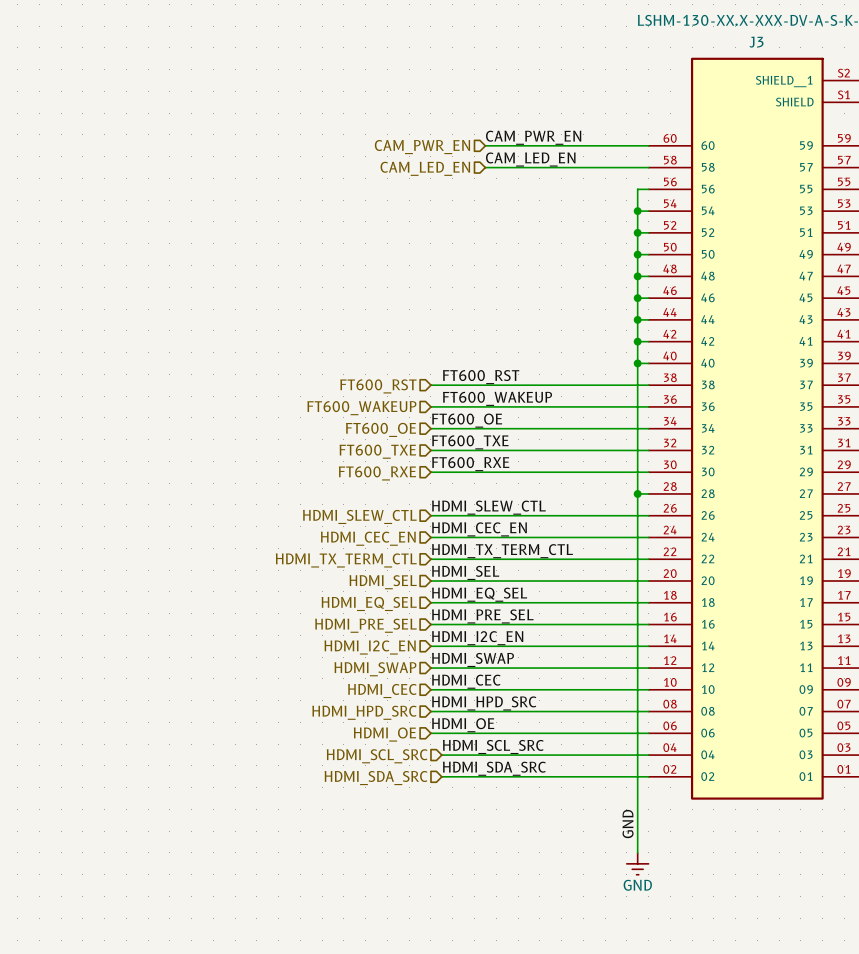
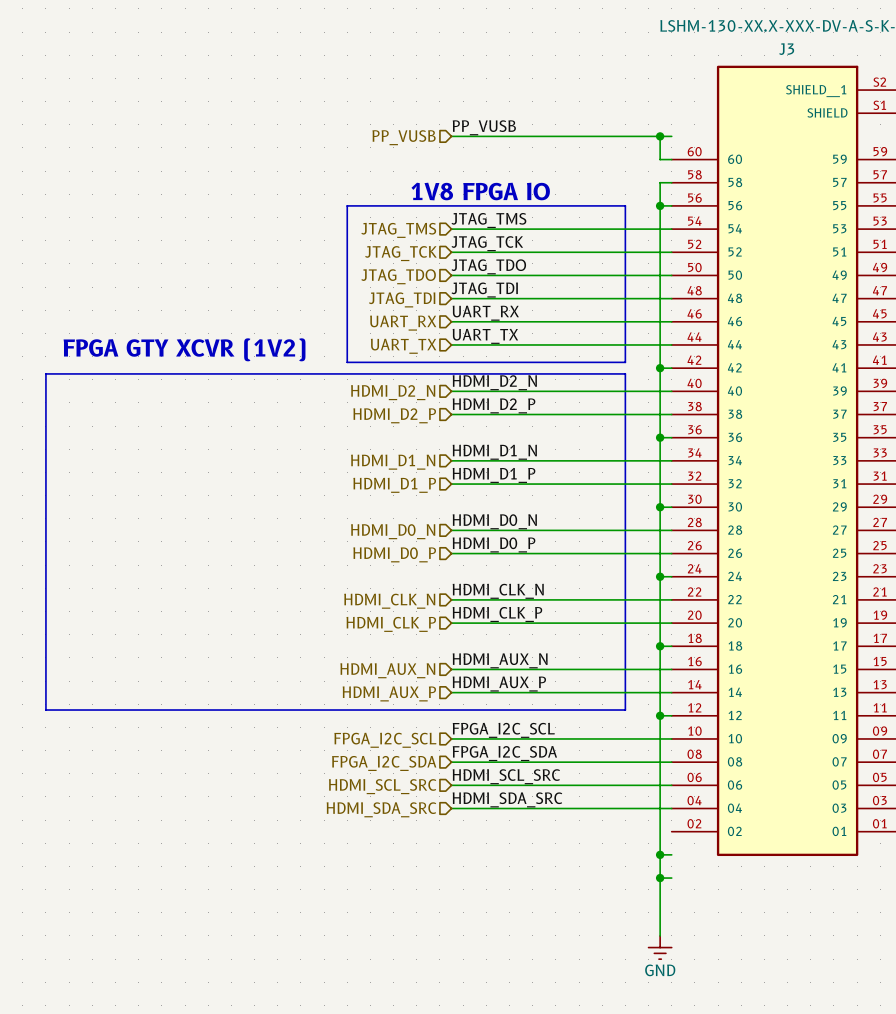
label: none -> PP_VUSB (484, 127)
wire: none -> (451, 136) (671, 136)
junction: none -> (660, 136)
hierarchical label: none -> PP_VUSB (404, 137)
label: CAM_PWR_EN (533, 137) -> none
wire: (485, 145) (637, 145) -> (660, 136) (660, 159)
hierarchical label: CAM_PWR_EN (422, 147) -> none
label: CAM_LED_EN (530, 159) -> none
wire: (485, 167) (637, 167) -> (660, 205) (660, 182)
hierarchical label: CAM_LED_EN (425, 168) -> none
text: none -> 1V8 FPGA IO (480, 191)
line: none -> (347, 205) (625, 205) (625, 362) (347, 362) (347, 205)
junction: none -> (660, 205)
label: none -> JTAG_TMS (488, 220)
wire: none -> (451, 229) (660, 229)
junction: (637, 211) -> none
hierarchical label: none -> JTAG_TMS (398, 230)
label: none -> JTAG_TCK (487, 243)
wire: none -> (451, 252) (660, 252)
junction: (637, 232) -> none
hierarchical label: none -> JTAG_TCK (400, 253)
label: none -> JTAG_TDO (488, 266)
wire: none -> (451, 275) (660, 275)
junction: (637, 254) -> none
hierarchical label: none -> JTAG_TDO (398, 276)
label: none -> JTAG_TDI (484, 290)
wire: none -> (451, 298) (660, 298)
junction: (637, 276) -> none
hierarchical label: none -> JTAG_TDI (402, 299)
label: none -> UART_RX (485, 313)
wire: none -> (451, 321) (660, 321)
junction: (637, 298) -> none
hierarchical label: none -> UART_RX (403, 323)
label: none -> UART_TX (485, 336)
wire: none -> (451, 344) (660, 344)
junction: (637, 319) -> none
hierarchical label: none -> UART_TX (403, 346)
text: none -> FPGA GTY XCVR (1V2) (184, 349)
line: none -> (45, 373) (625, 373) (625, 710) (45, 710) (45, 373)
label: none -> HDMI_D2_N (494, 382)
wire: none -> (451, 391) (660, 391)
junction: (637, 363) -> none
hierarchical label: none -> HDMI_D2_N (393, 392)
label: FT600_RST (481, 377) -> HDMI_D2_P (494, 405)
wire: (430, 385) (441, 385) -> none
hierarchical label: FT600_RST (378, 386) -> none
hierarchical label: none -> HDMI_D2_P (394, 415)
label: FT600_WAKEUP (497, 398) -> none
wire: (430, 406) (637, 406) -> none
junction: none -> (660, 437)
hierarchical label: FT600_WAKEUP (361, 408) -> none
label: FT600_OE (467, 420) -> none
label: none -> HDMI_D1_N (494, 452)
wire: (430, 428) (441, 428) -> none
hierarchical label: FT600_OE (381, 429) -> none
hierarchical label: none -> HDMI_D1_N (393, 462)
label: FT600_TXE (470, 442) -> none
label: none -> HDMI_D1_P (494, 475)
wire: (430, 450) (441, 450) -> none
hierarchical label: FT600_TXE (377, 451) -> none
hierarchical label: none -> HDMI_D1_P (394, 485)
label: FT600_RXE (470, 464) -> none
wire: (430, 472) (637, 472) -> none
junction: none -> (660, 507)
hierarchical label: FT600_RXE (377, 473) -> none
label: none -> HDMI_D0_N (494, 521)
wire: none -> (451, 530) (660, 530)
junction: (637, 493) -> none
hierarchical label: none -> HDMI_D0_N (393, 531)
label: none -> HDMI_D0_P (494, 544)
label: HDMI_SLEW_CTL (488, 507) -> none
wire: (430, 515) (441, 515) -> none
hierarchical label: HDMI_SLEW_CTL (359, 516) -> none
hierarchical label: none -> HDMI_D0_P (394, 554)
label: HDMI_CEC_EN (479, 529) -> none
wire: (430, 537) (637, 537) -> none
junction: none -> (660, 576)
hierarchical label: HDMI_CEC_EN (368, 538) -> none
label: none -> HDMI_CLK_N (498, 591)
label: HDMI_TX_TERM_CTL (502, 551) -> none
wire: (430, 559) (441, 559) -> none
hierarchical label: HDMI_TX_TERM_CTL (346, 560) -> none
hierarchical label: none -> HDMI_CLK_N (389, 601)
label: HDMI_SEL (465, 572) -> HDMI_CLK_P (497, 614)
wire: (430, 581) (441, 581) -> none
hierarchical label: HDMI_SEL (383, 582) -> HDMI_CLK_P (391, 624)
label: HDMI_EQ_SEL (479, 594) -> none
wire: (430, 602) (637, 602) -> none
junction: none -> (660, 646)
hierarchical label: HDMI_EQ_SEL (369, 603) -> none
label: HDMI_PRE_SEL (482, 616) -> none
wire: (430, 624) (441, 624) -> none
hierarchical label: HDMI_PRE_SEL (365, 625) -> none
label: HDMI_I2C_EN (477, 638) -> HDMI_AUX_N (500, 660)
wire: (430, 646) (441, 646) -> none
hierarchical label: HDMI_I2C_EN (370, 647) -> HDMI_AUX_N (387, 670)
label: HDMI_SWAP (472, 659) -> HDMI_AUX_P (499, 684)
wire: (430, 668) (637, 668) -> none
junction: none -> (660, 715)
hierarchical label: HDMI_SWAP (375, 669) -> HDMI_AUX_P (389, 693)
label: HDMI_CEC (466, 681) -> none
label: none -> FPGA_I2C_SCL (503, 730)
wire: (430, 689) (441, 689) -> none
hierarchical label: none -> FPGA_I2C_SCL (385, 740)
hierarchical label: HDMI_CEC (382, 691) -> none
label: HDMI_HPD_SRC (484, 703) -> HDMI_SCL_SRC (506, 776)
label: none -> FPGA_I2C_SDA (504, 753)
wire: (430, 711) (441, 711) -> none
hierarchical label: HDMI_HPD_SRC (364, 712) -> HDMI_SCL_SRC (382, 786)
hierarchical label: none -> FPGA_I2C_SDA (384, 763)
label: HDMI_OE (463, 725) -> none
wire: (430, 733) (441, 733) -> none
hierarchical label: HDMI_OE (384, 734) -> none
label: HDMI_SCL_SRC (493, 746) -> HDMI_SDA_SRC (507, 799)
hierarchical label: HDMI_SCL_SRC (377, 756) -> HDMI_SDA_SRC (381, 809)
label: HDMI_SDA_SRC (494, 768) -> none
wire: (441, 776) (648, 776) -> none
hierarchical label: HDMI_SDA_SRC (376, 778) -> none
wire: none -> (660, 854) (671, 854)
junction: none -> (660, 854)
wire: none -> (660, 878) (671, 878)
junction: none -> (660, 878)
label: GND (628, 824) -> none
power symbol position: GND (637, 863) -> GND (660, 947)

